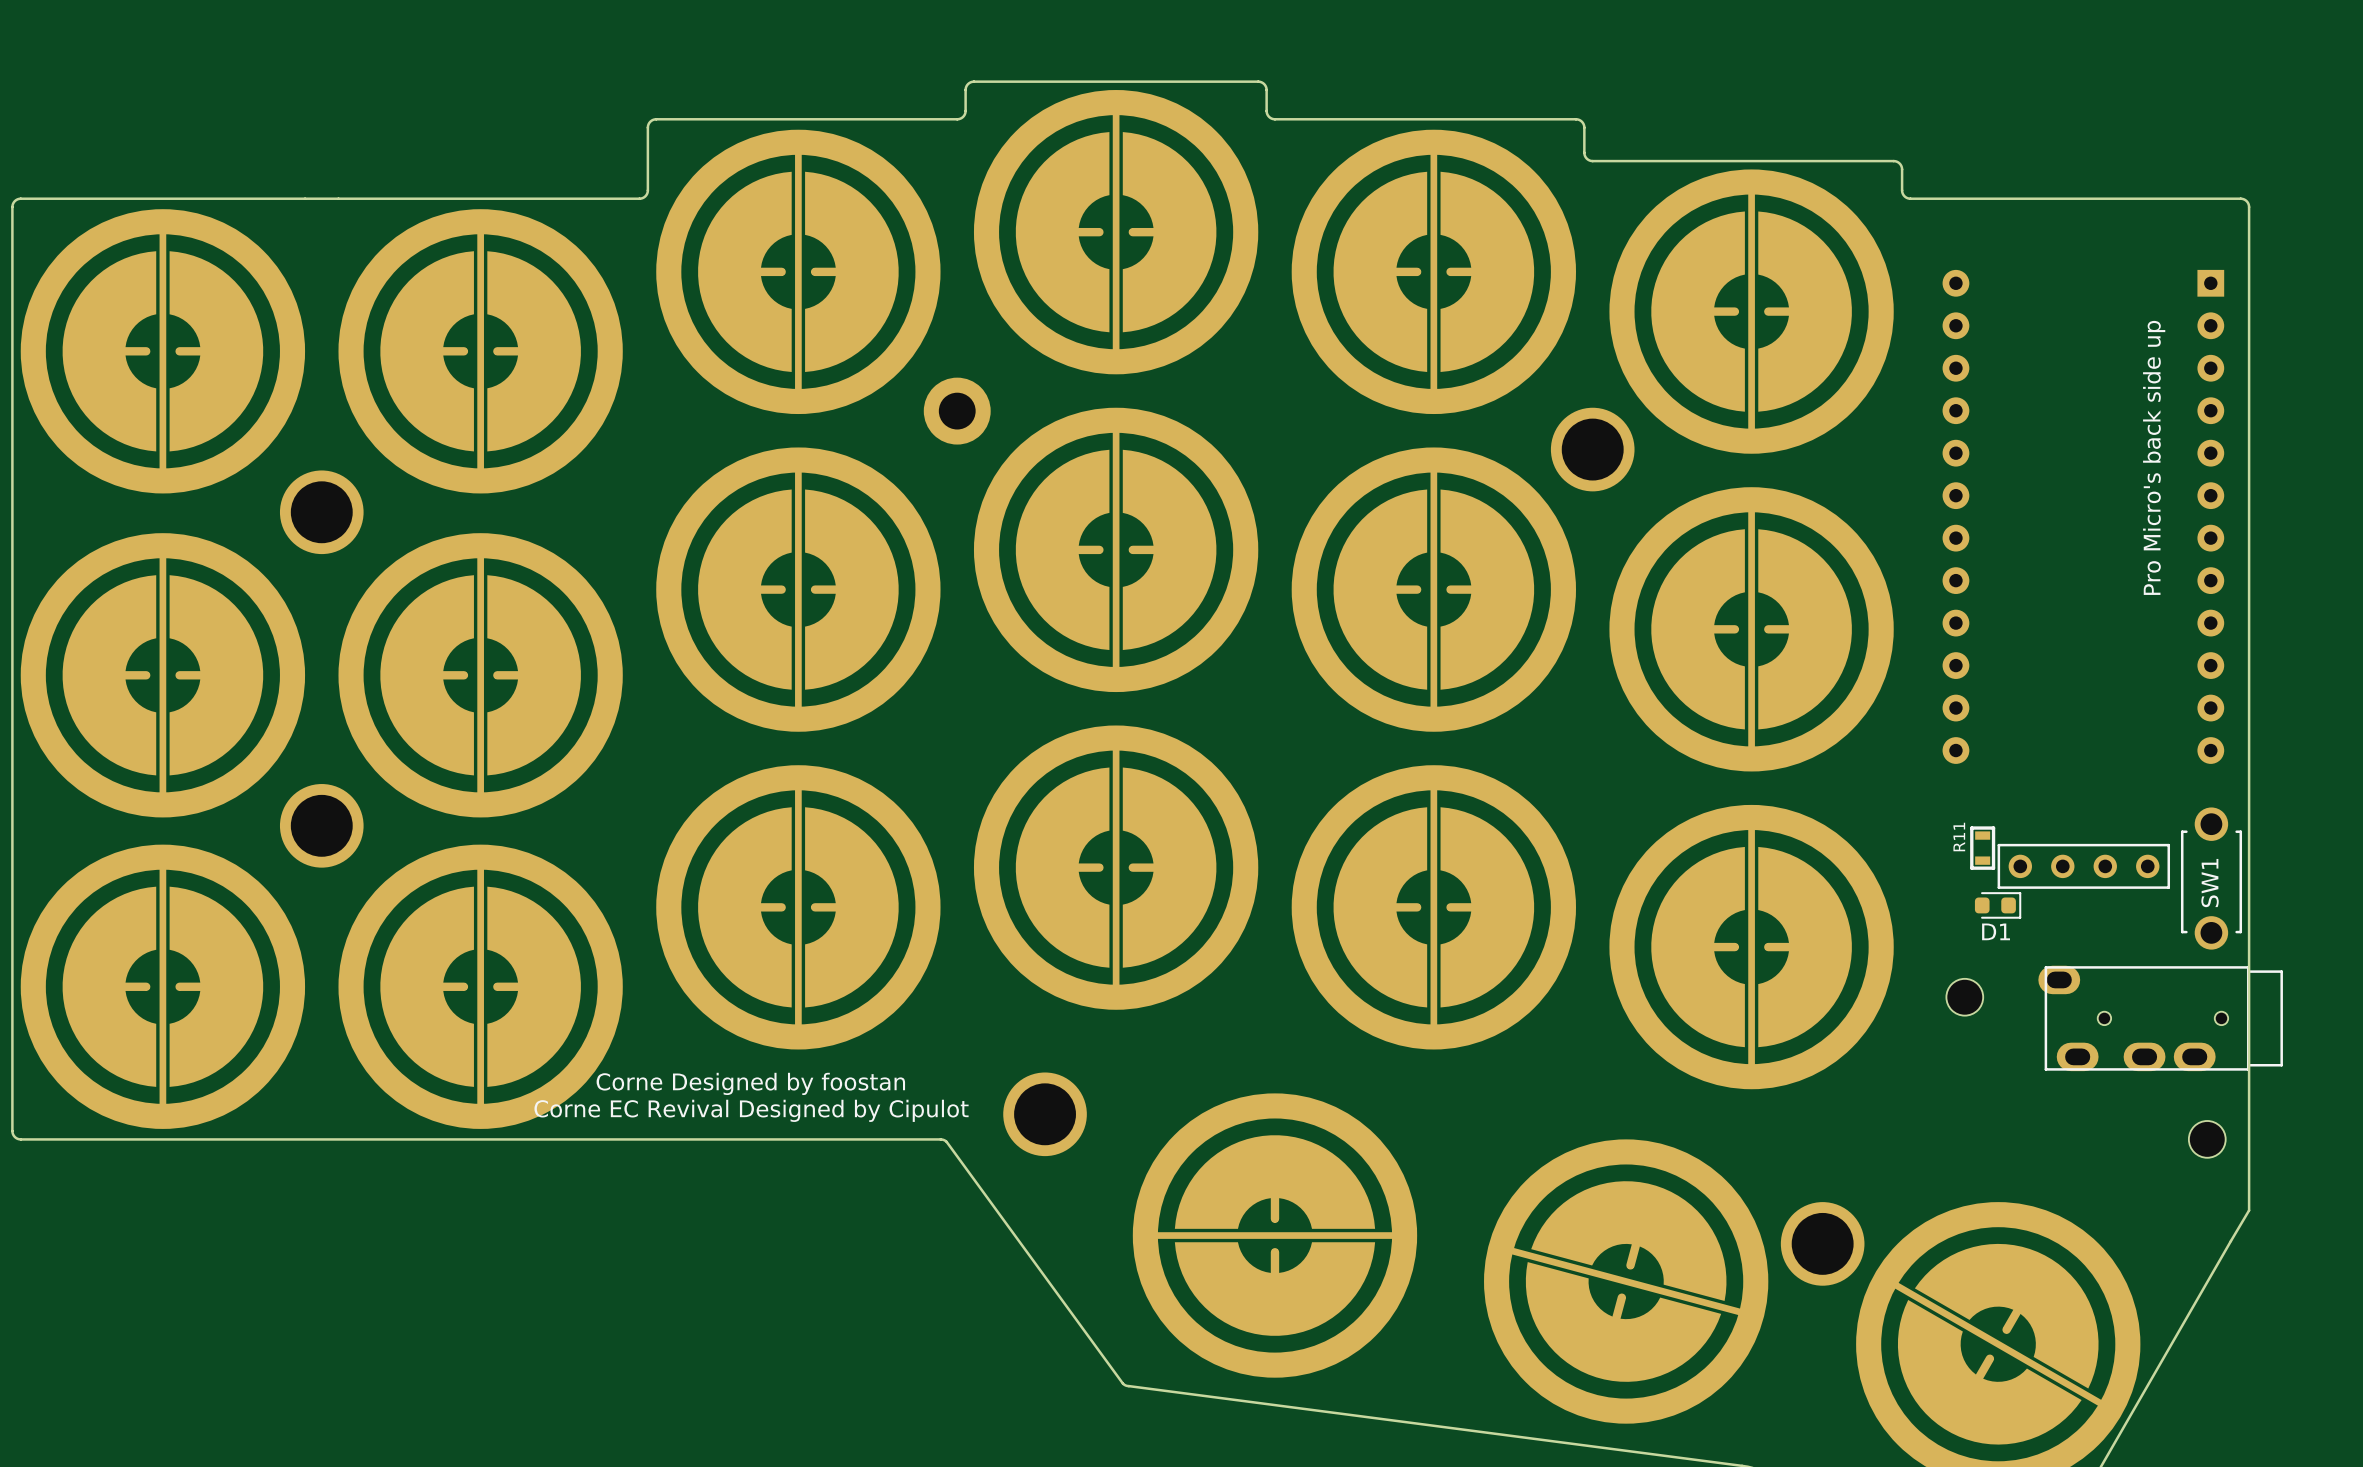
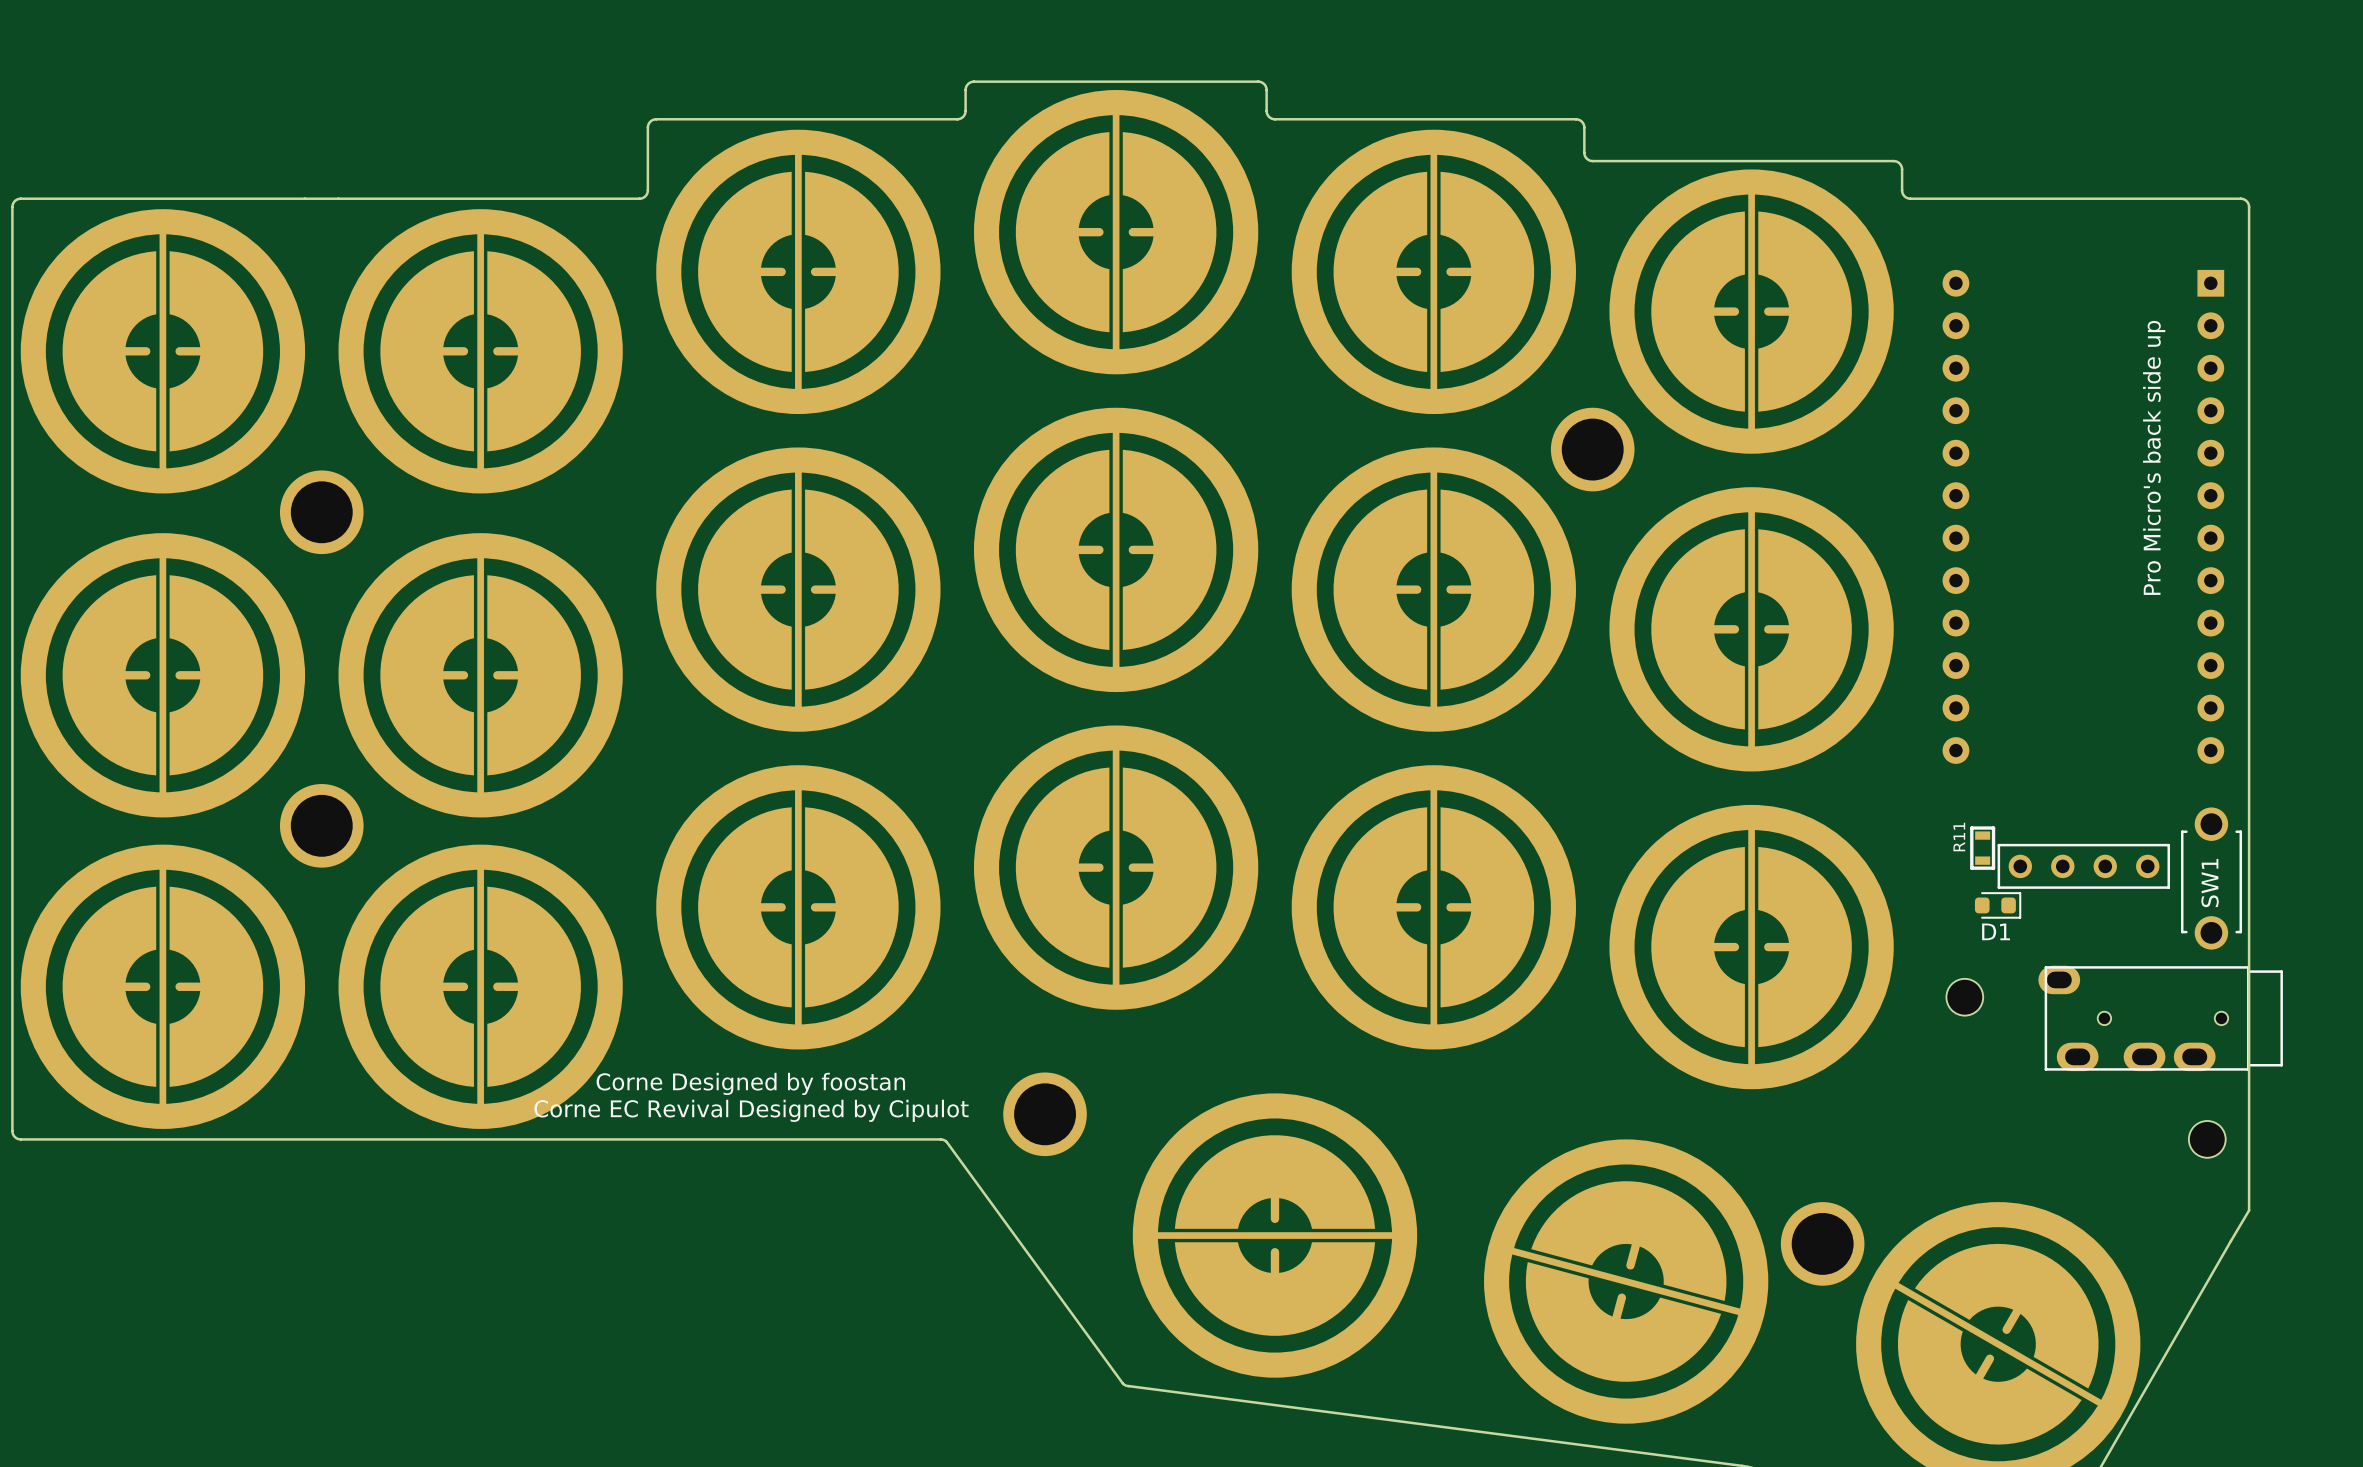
part: (957, 411) -> none

